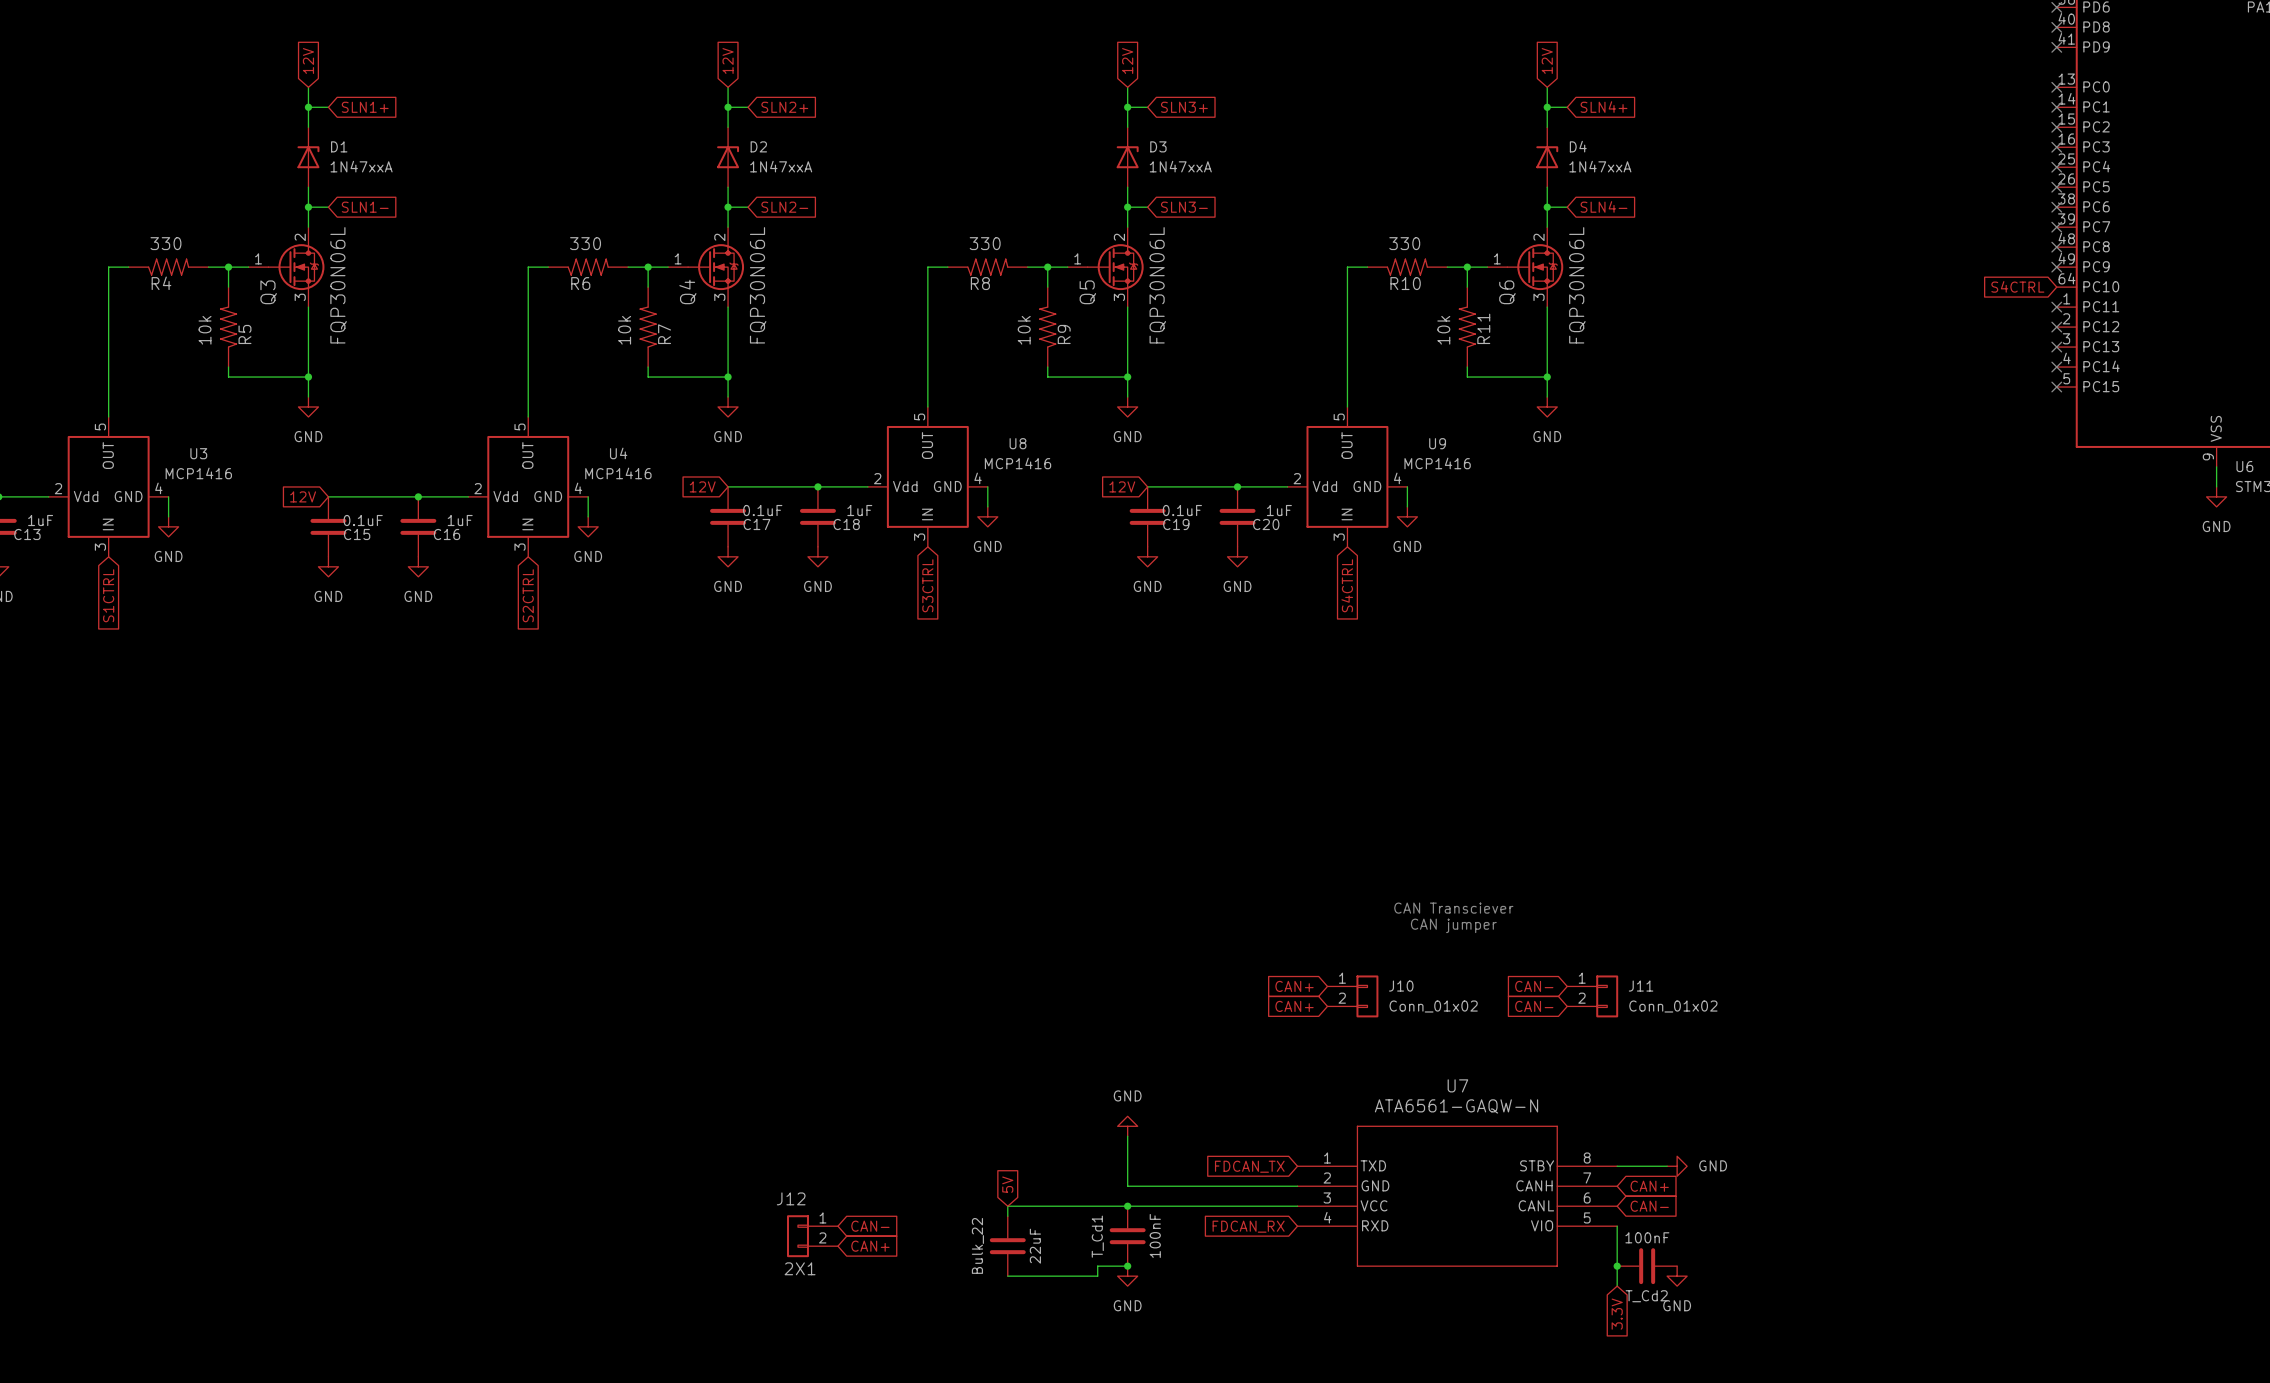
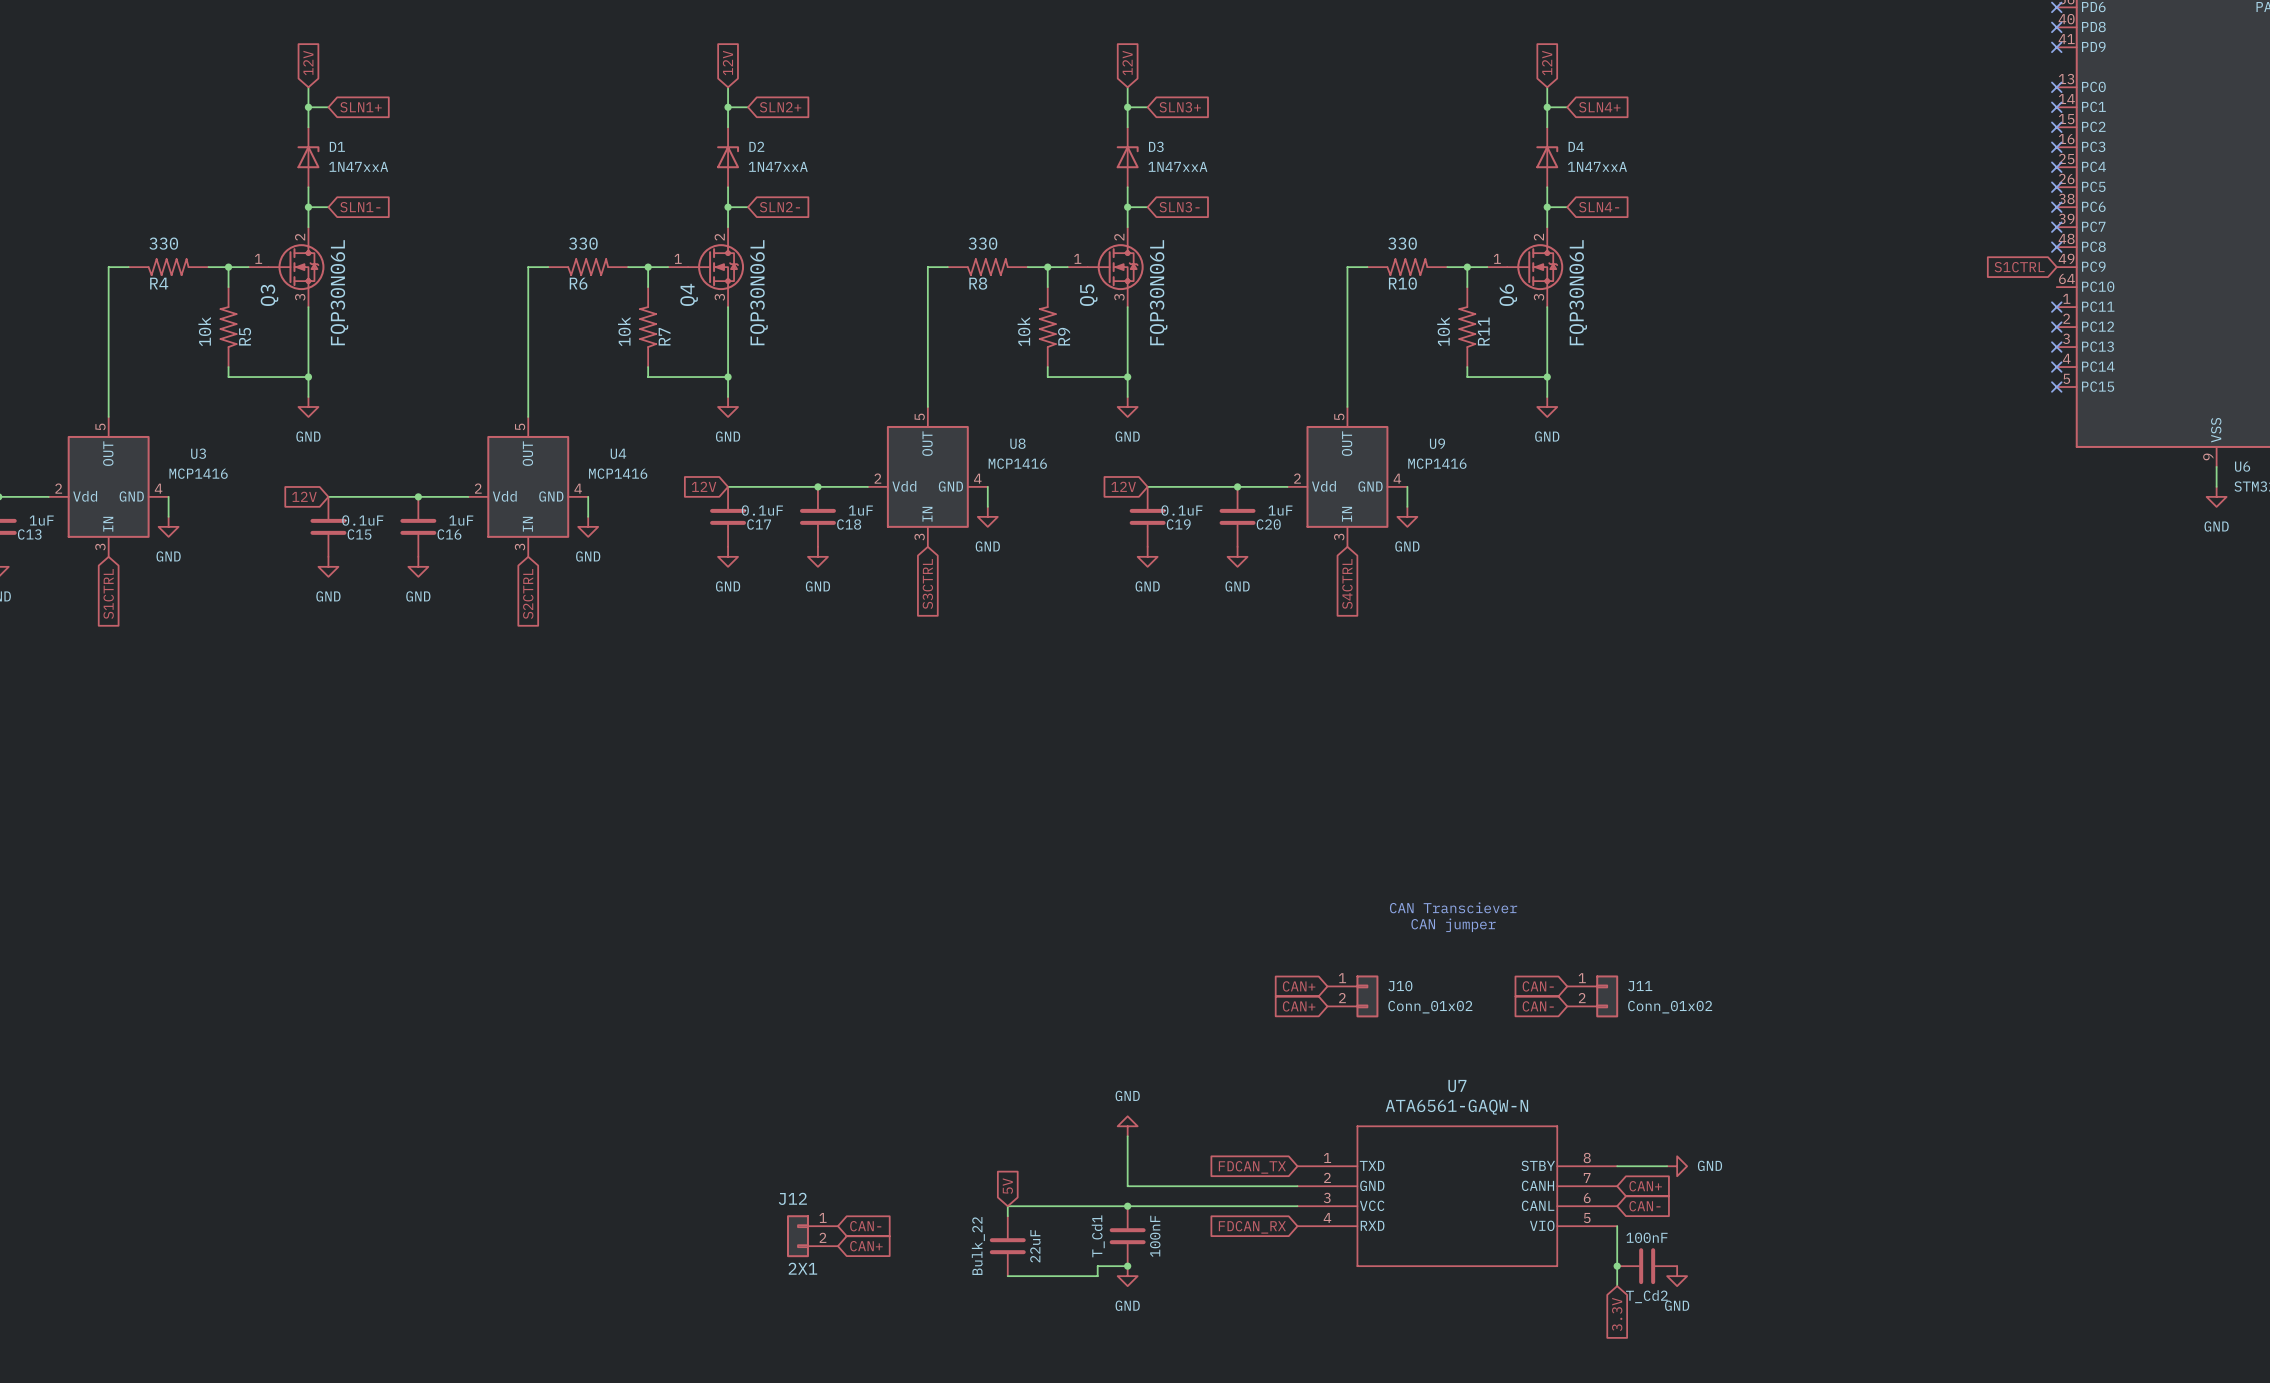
no-connect mark: (2056, 267) -> none
global label: S4CTRL (2017, 286) -> S1CTRL (2019, 267)

